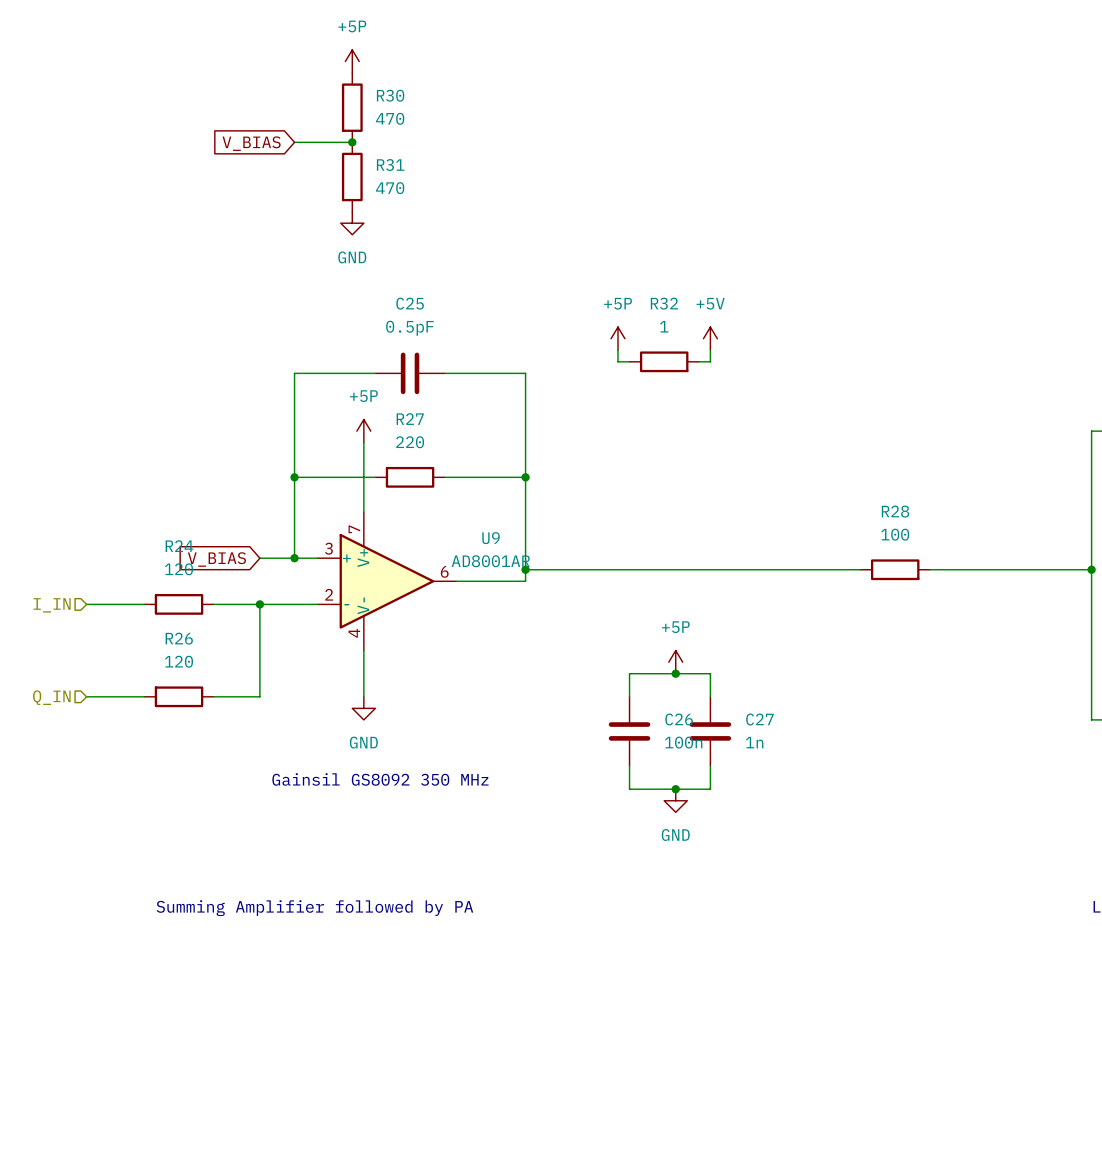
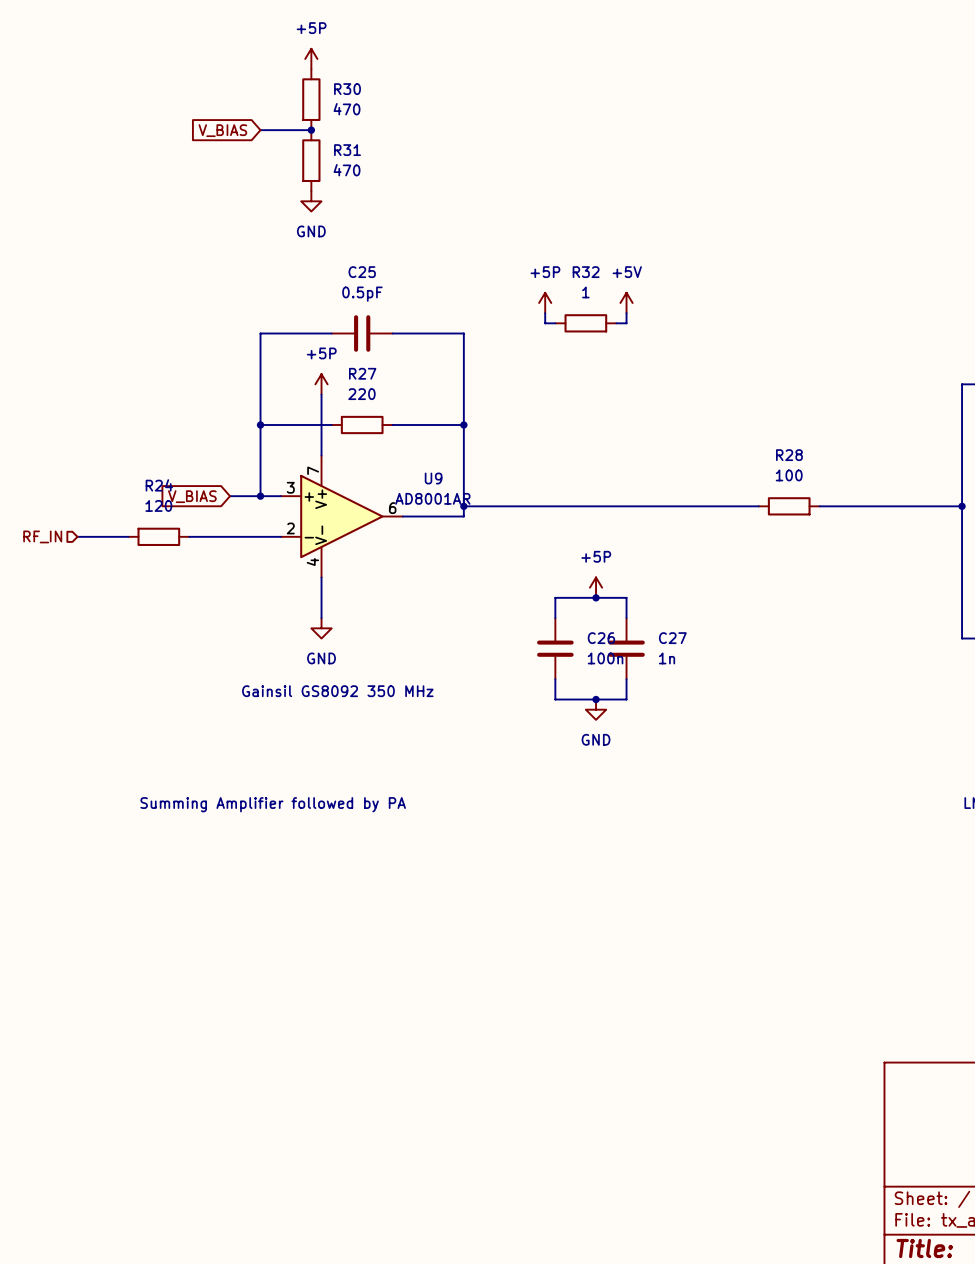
wire: (259, 604) (259, 696) (213, 696) -> none
junction: (259, 604) -> none
hierarchical label: I_IN (52, 605) -> RF_IN (42, 536)
wire: (86, 696) (144, 696) -> none
R26: 120 (179, 696) -> none
hierarchical label: Q_IN (51, 697) -> none

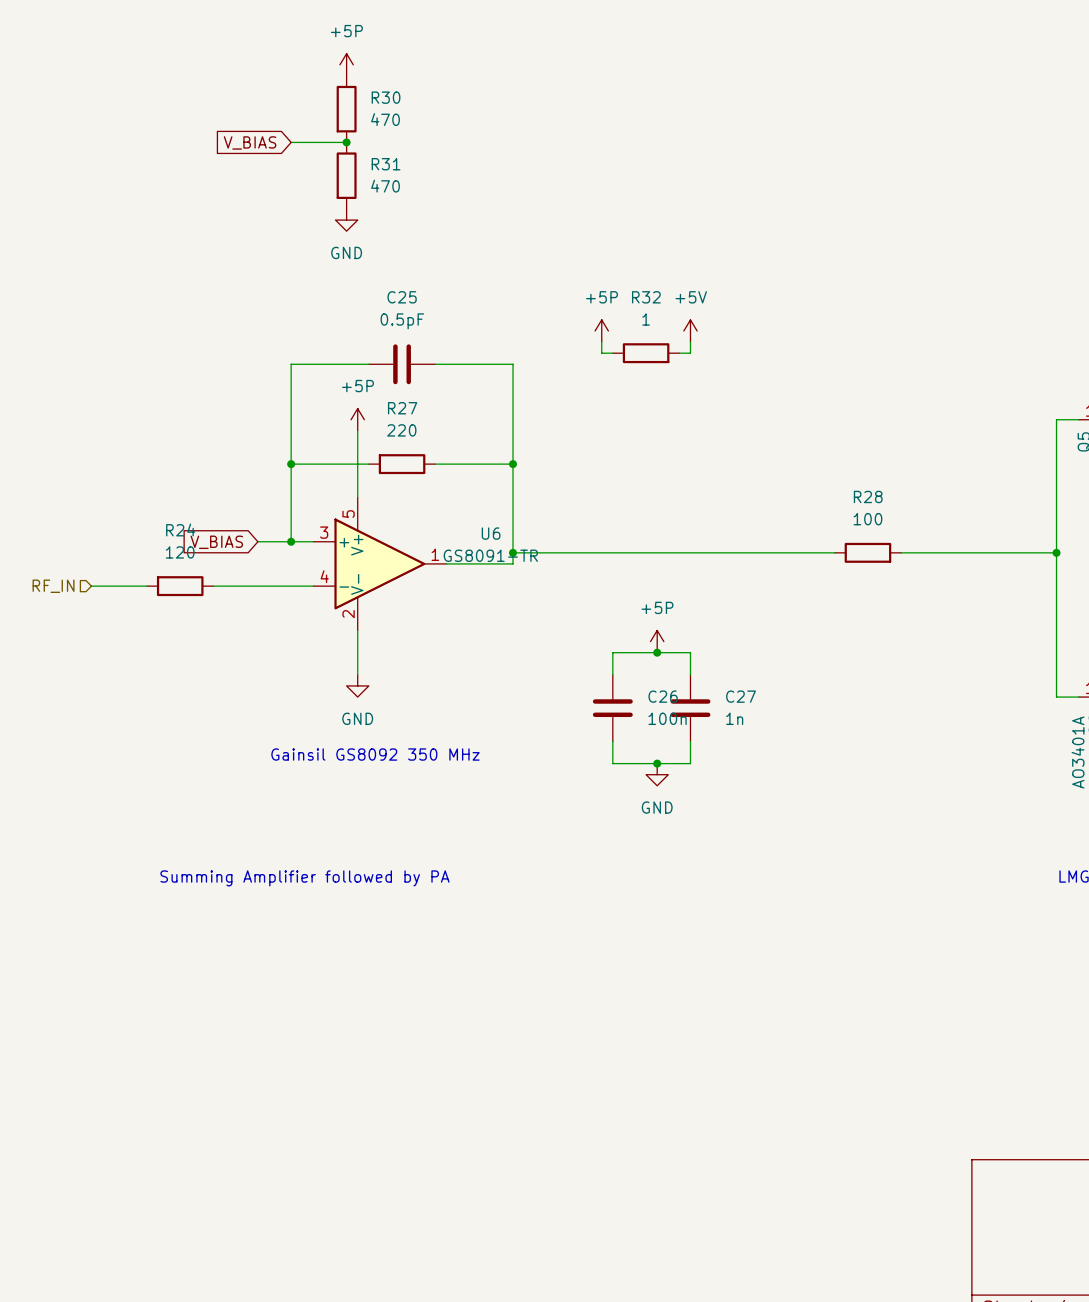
U9 pin number: 7 (313, 470) -> 5 (348, 514)
U9 name: U9 (433, 478) -> U6 (491, 533)
U9 value: AD8001AR (432, 498) -> GS8091-TR (490, 555)
U9 pin number: 6 (392, 508) -> 1 (435, 554)
U9 pin number: 2 (290, 528) -> 4 (324, 576)
U9 pin number: 4 (312, 562) -> 2 (348, 614)

